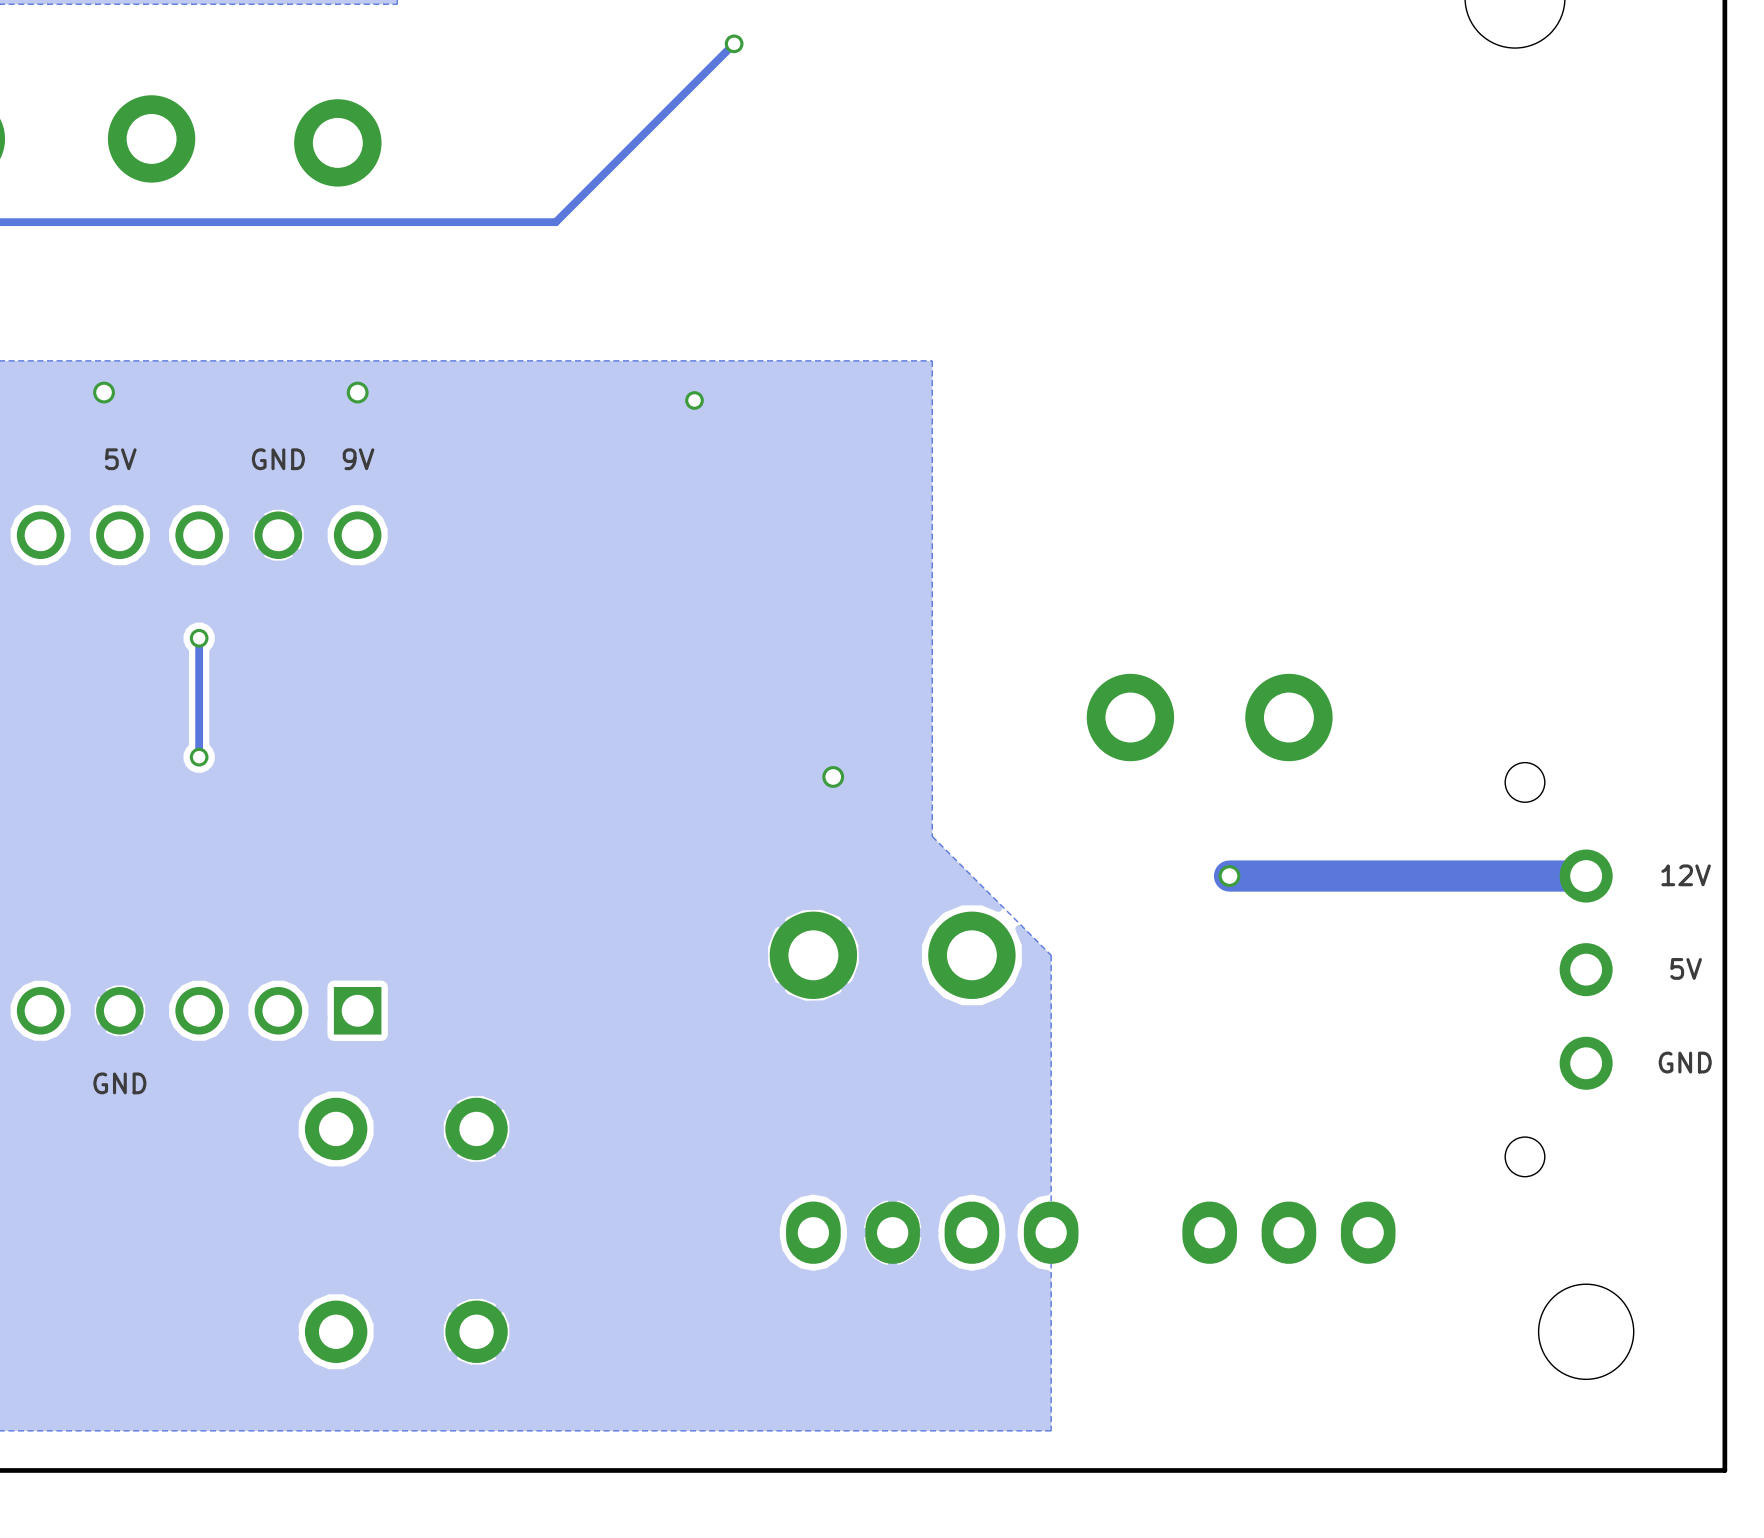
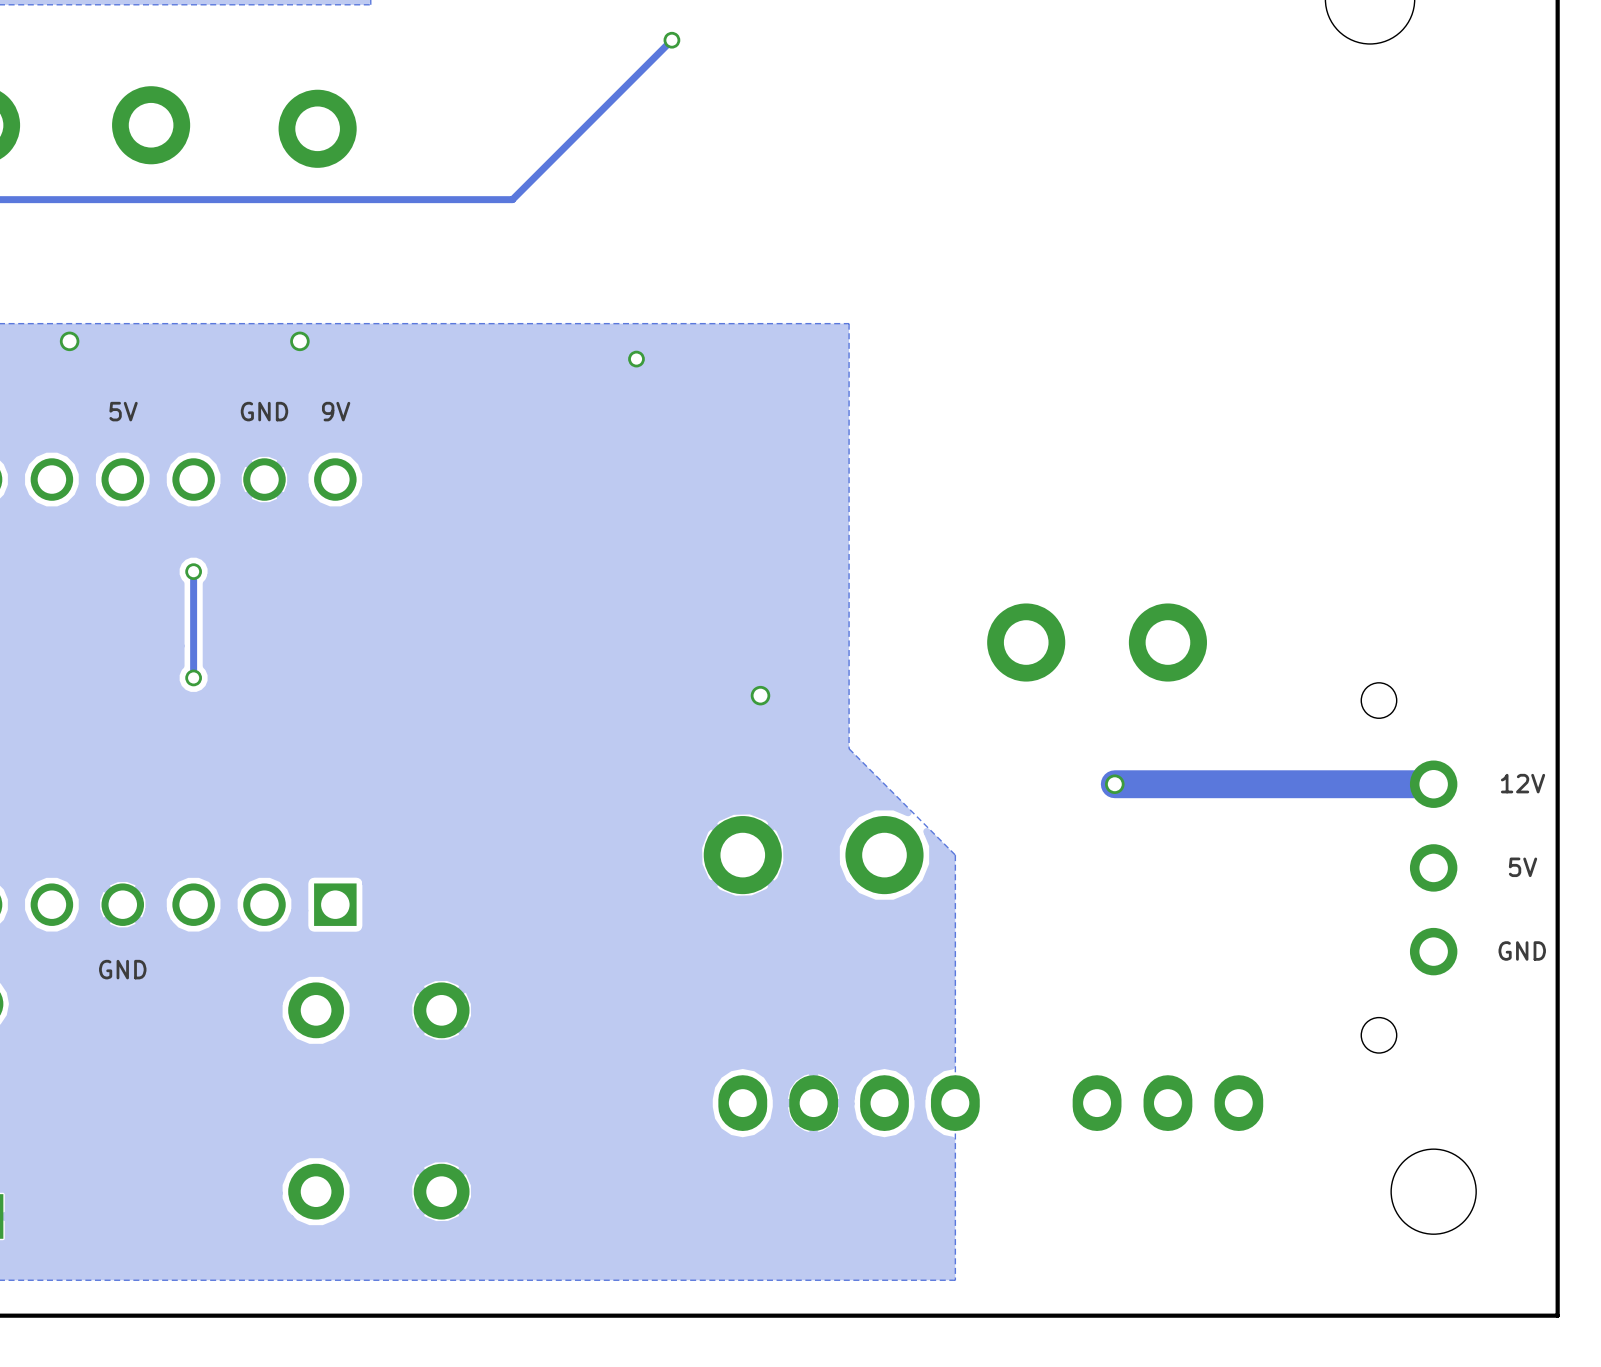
via position: (104, 392) -> (69, 341)
via position: (357, 392) -> (299, 341)

